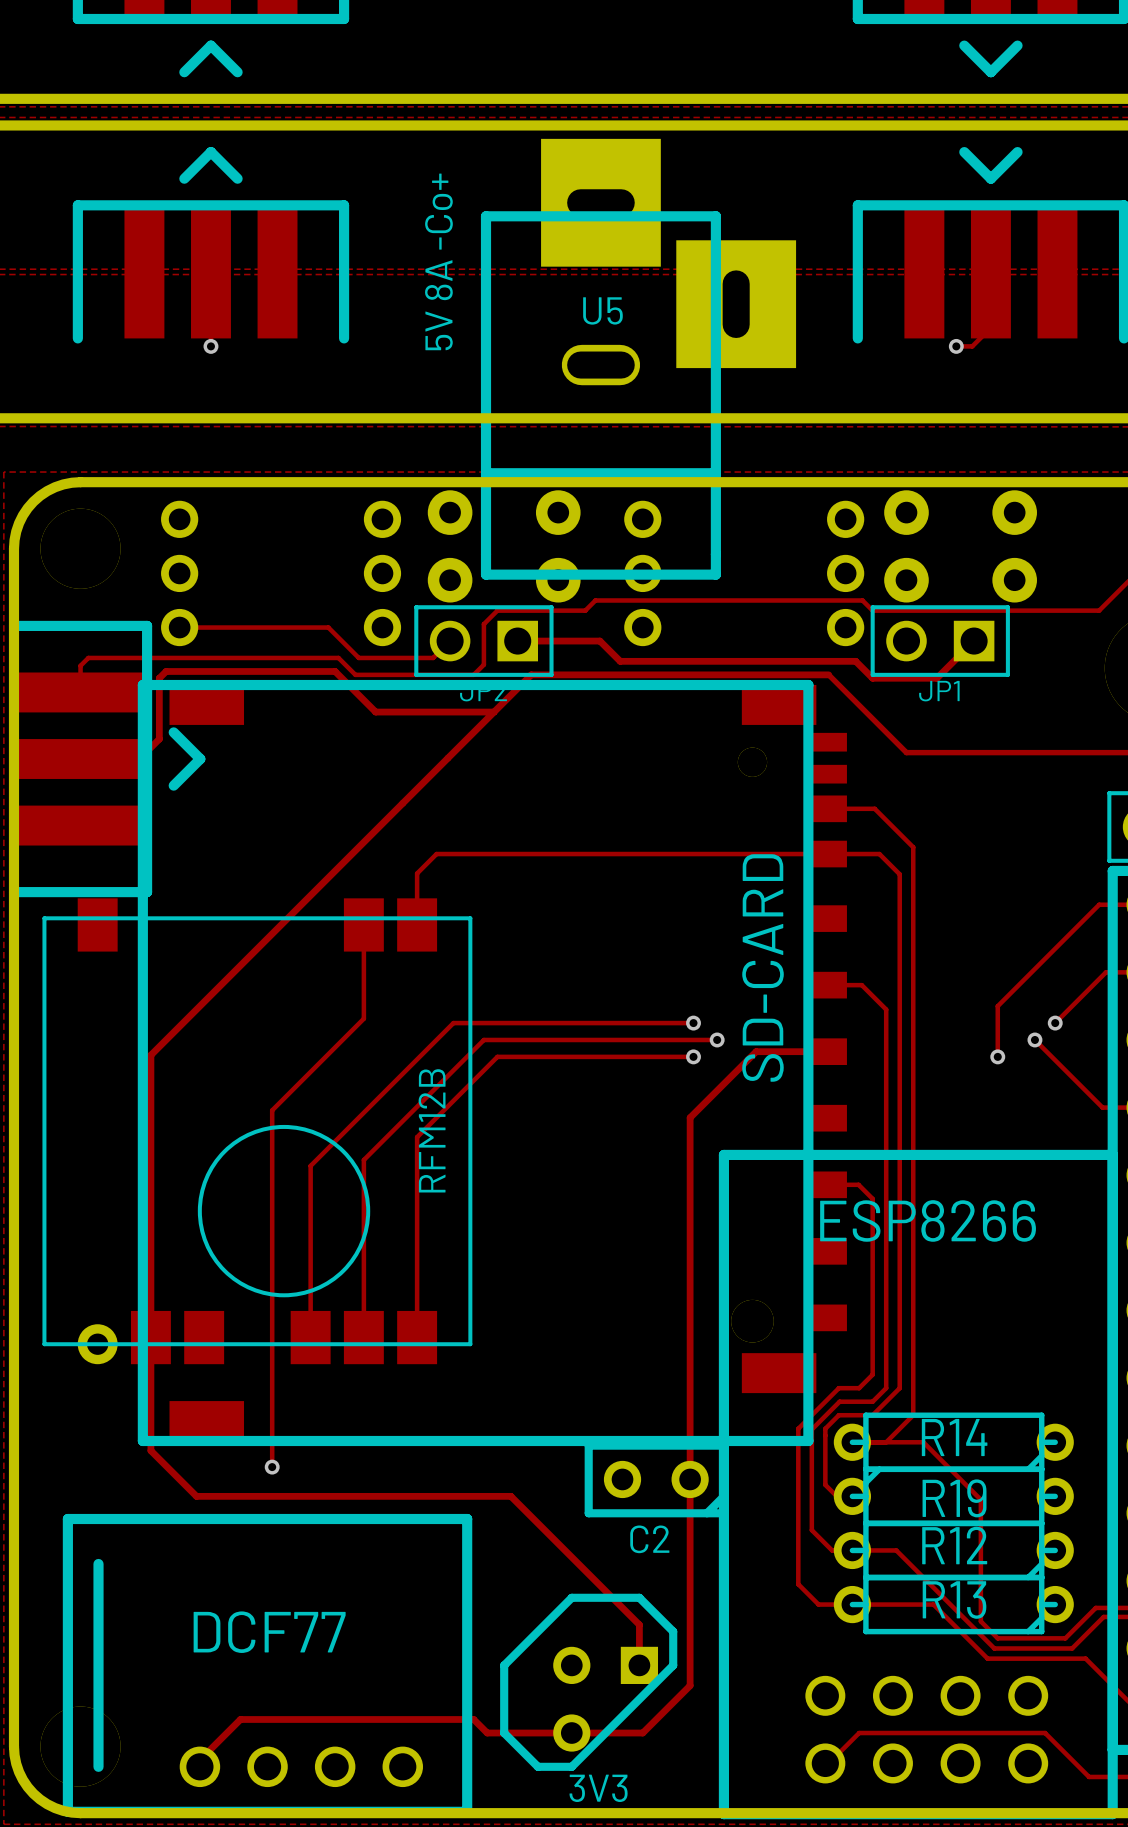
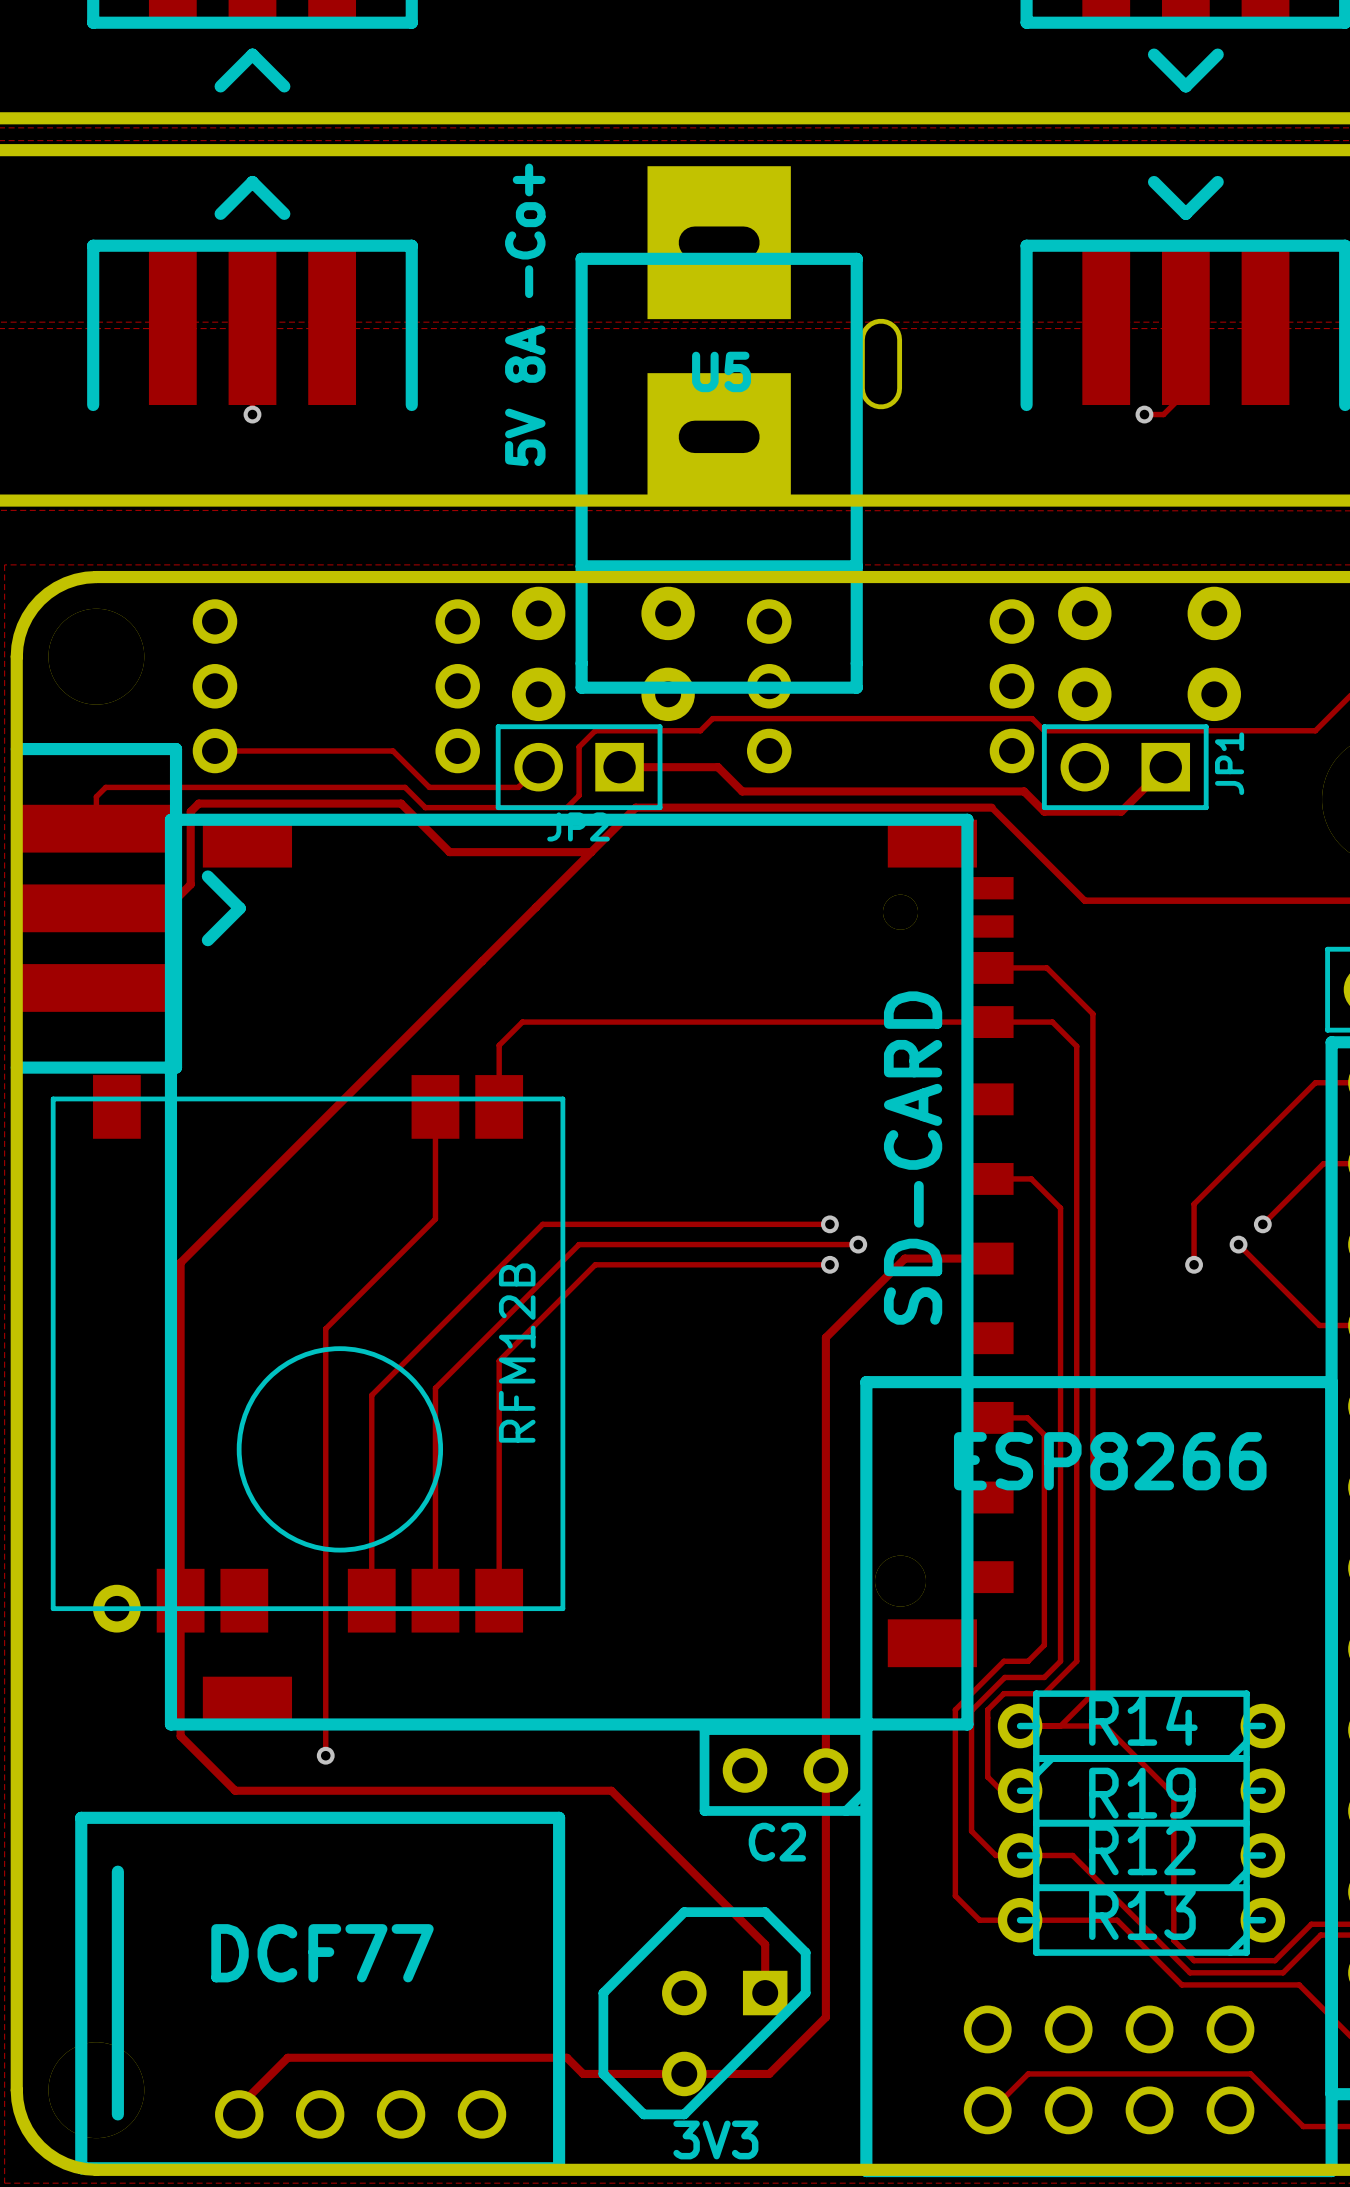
U5 footprint: [480, 138, 797, 580] -> [575, 166, 903, 694]
JP1 name rotation: 0° (939, 691) -> 90° counterclockwise (1229, 763)
JP1 name position: JP1 (939, 691) -> JP1 (1229, 763)

